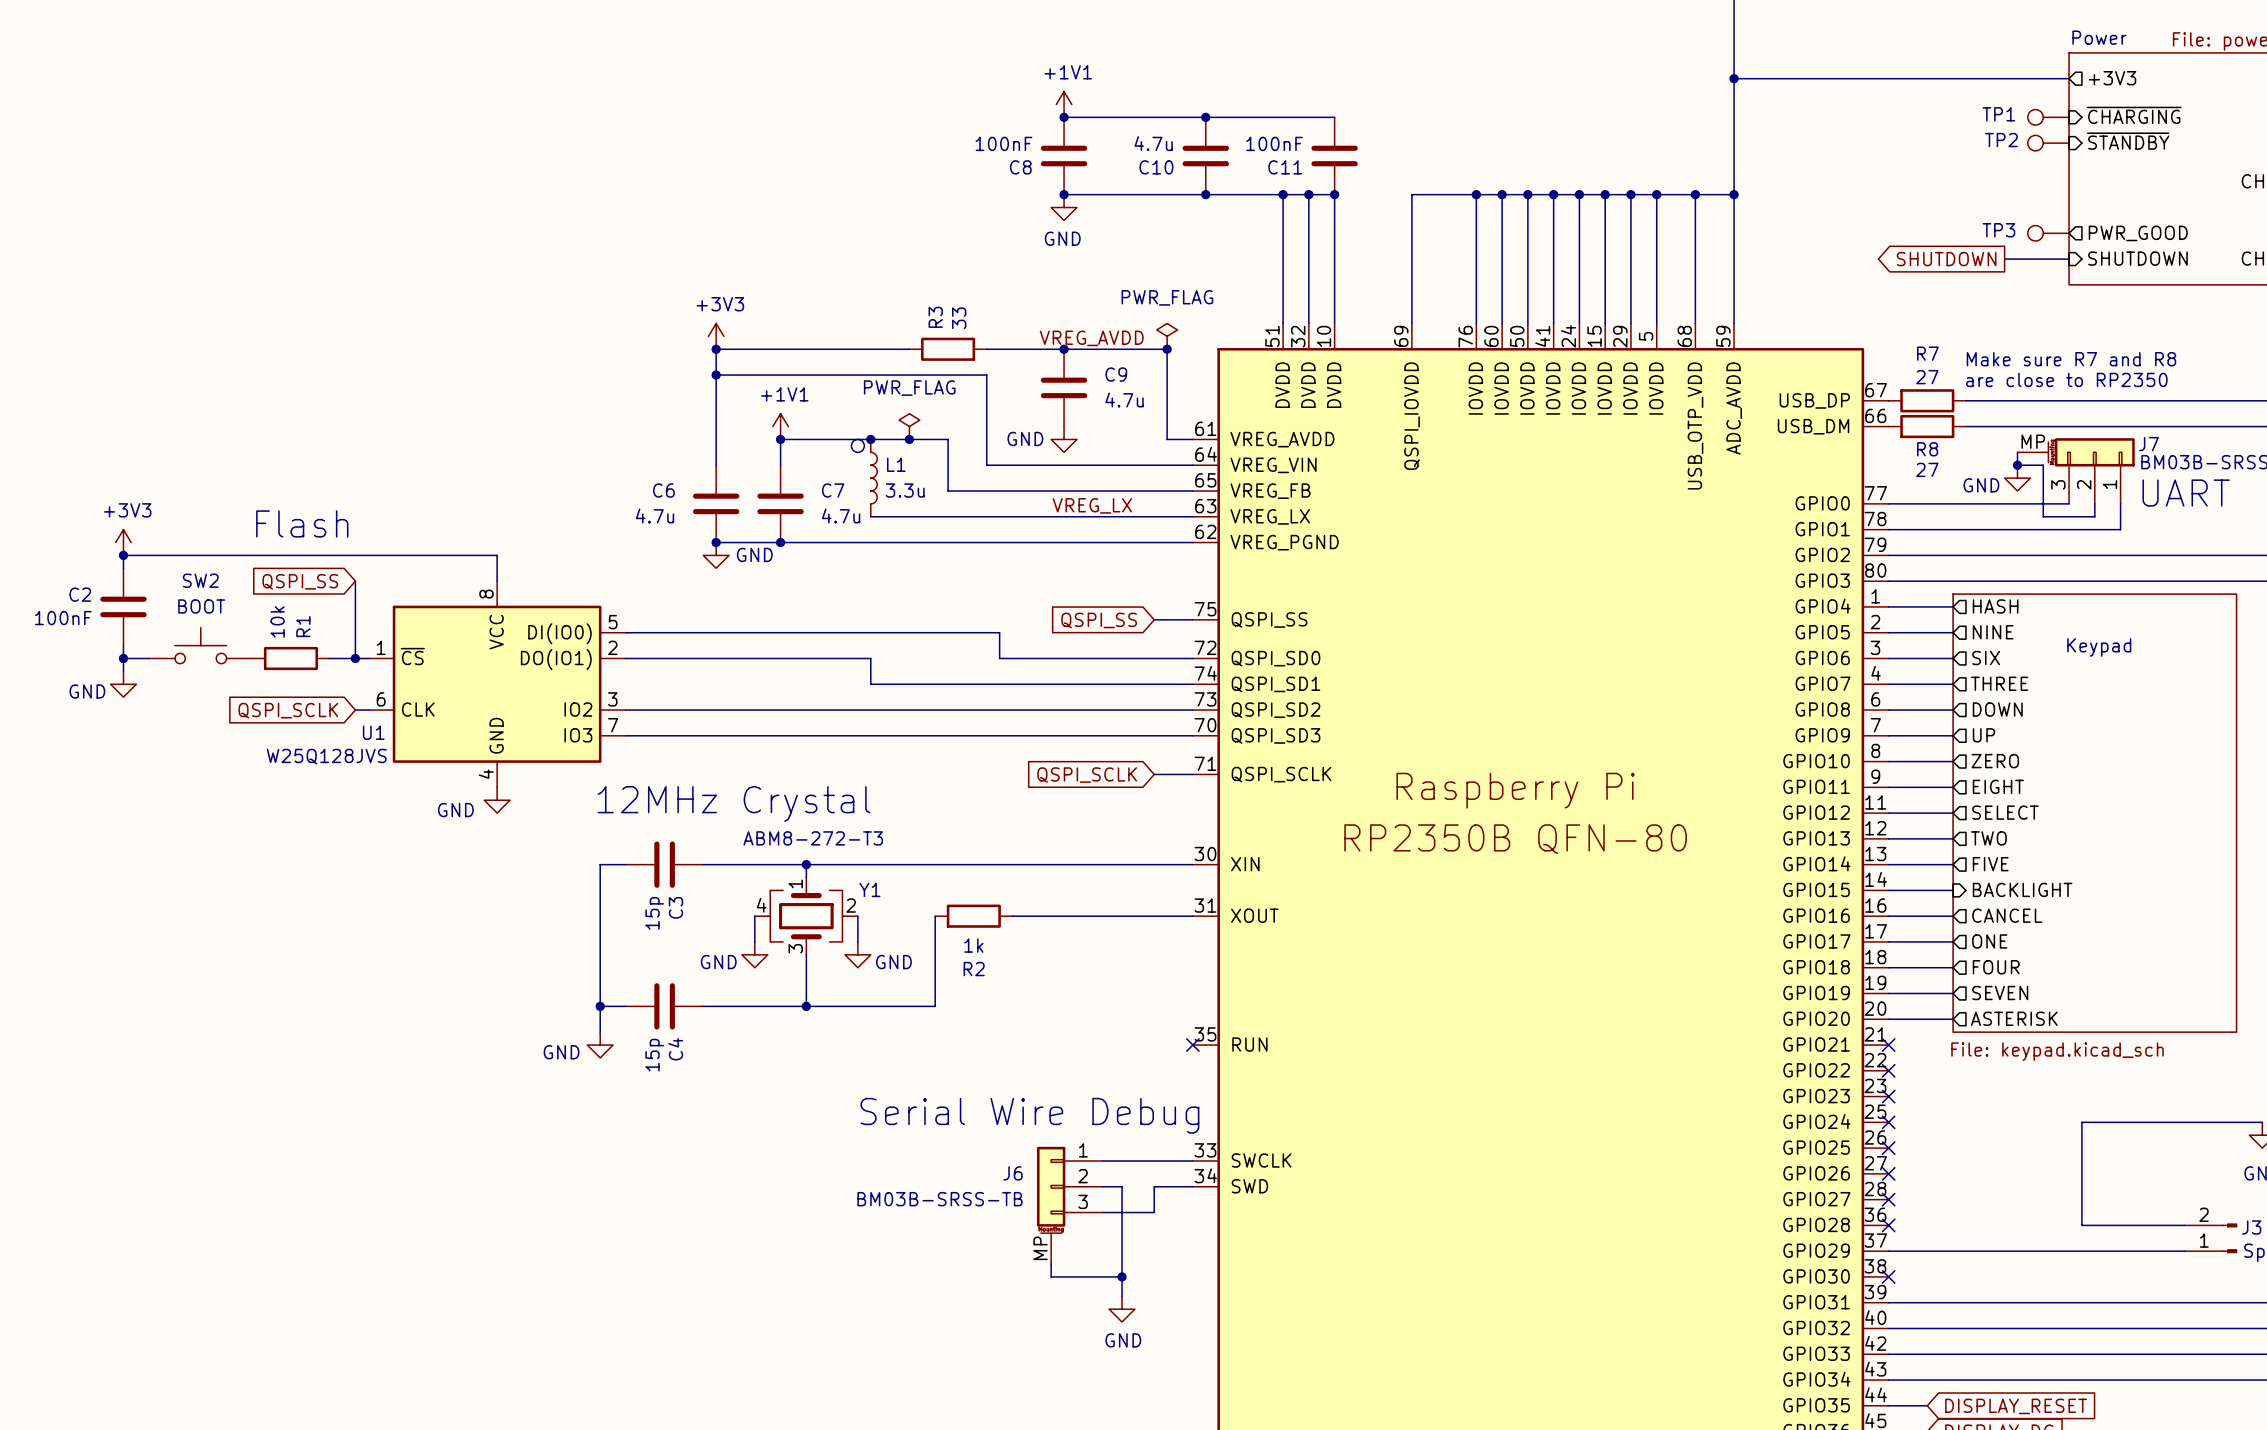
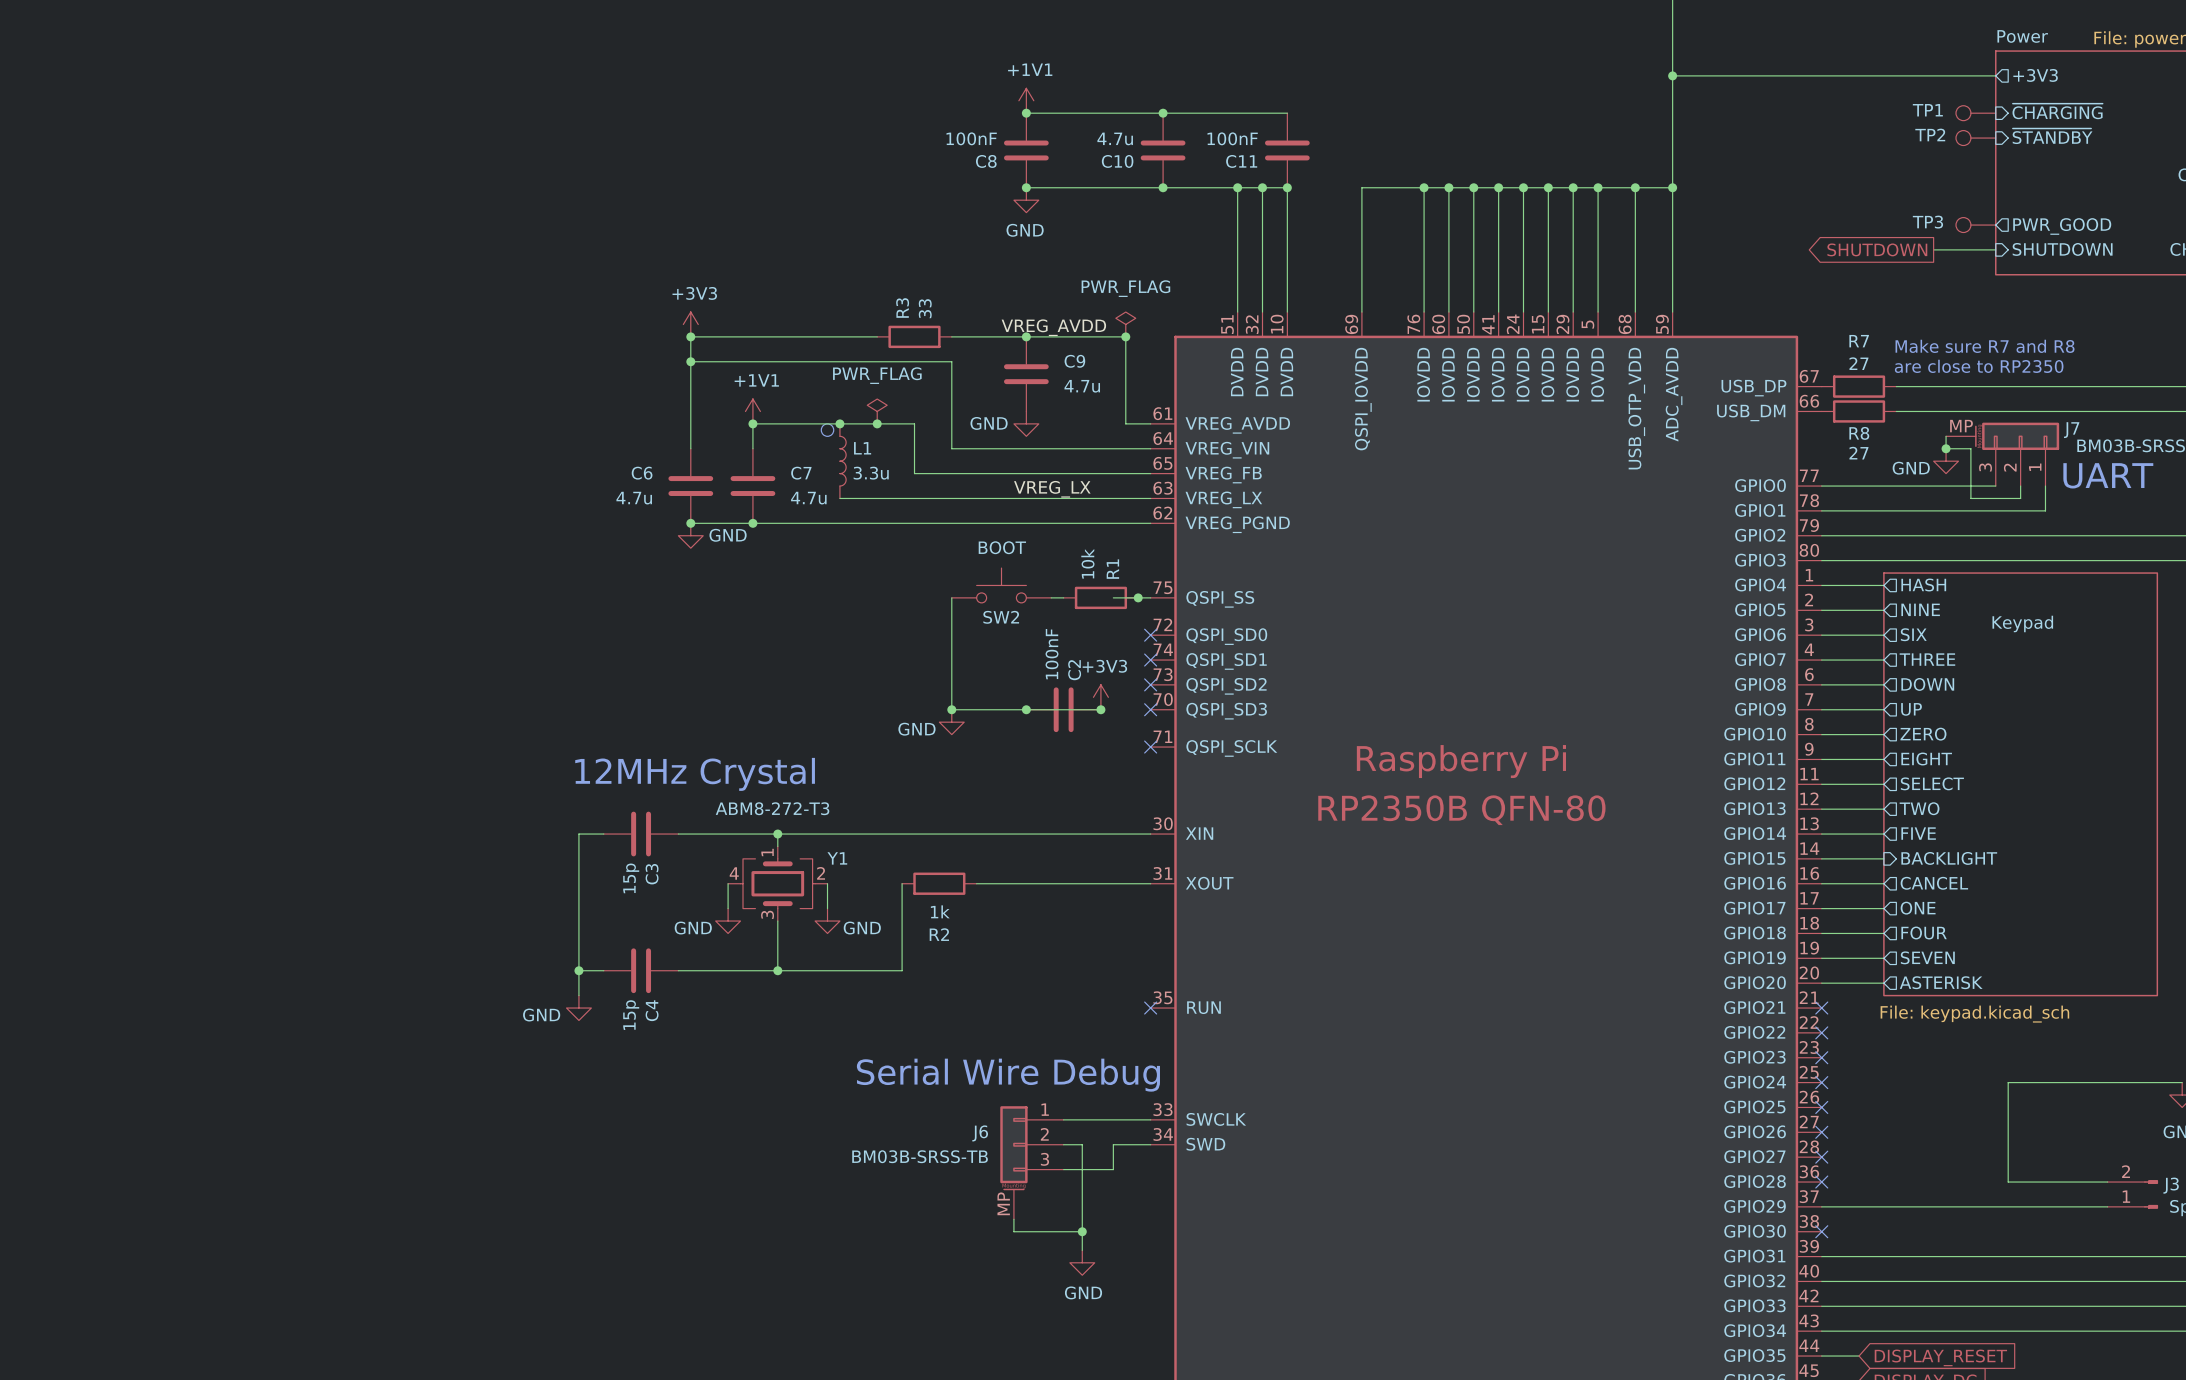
text: Flash (302, 523) -> none
power symbol: +3V3 (123, 542) -> none
junction: (123, 555) -> none
wire: (123, 568) (123, 555) (497, 555) (497, 581) -> none
SW2 name position: SW2 (200, 580) -> SW2 (1001, 617)
global label: QSPI_SS (300, 581) -> none
wire: (355, 581) (355, 658) -> none
C2 rotation: 0° (123, 606) -> 90° clockwise (1063, 709)
C2 position: (123, 606) -> (1063, 709)
wire: none -> (1051, 597) (1063, 597)
junction: none -> (1138, 597)
global label: QSPI_SS (1099, 620) -> none
wire: (625, 632) (999, 632) (999, 658) (1192, 658) -> none
wire: (123, 645) (123, 671) -> none
SW2 position: (200, 645) -> (1001, 585)
wire: (123, 658) (149, 658) -> none
junction: (123, 658) -> none
R1 position: (290, 658) -> (1100, 597)
wire: (329, 658) (368, 658) -> none
junction: (355, 658) -> none
wire: (625, 658) (870, 658) (870, 684) (1192, 684) -> none
no-connect mark: none -> (1150, 635)
power symbol: GND (123, 684) -> none
U1: W25Q128JVS (497, 684) -> none
no-connect mark: none -> (1150, 660)
global label: QSPI_SCLK (288, 710) -> none
wire: (355, 710) (368, 710) -> none
wire: (625, 710) (1192, 710) -> none
no-connect mark: none -> (1150, 684)
power symbol: none -> +3V3 (1100, 697)
wire: (625, 735) (986, 735) -> (951, 597) (951, 709)
junction: none -> (951, 709)
junction: none -> (1026, 709)
wire: (1141, 735) (1192, 735) -> none
junction: none -> (1100, 709)
no-connect mark: none -> (1150, 709)
power symbol: none -> GND (951, 722)
wire: (1154, 774) (1192, 774) -> none
no-connect mark: none -> (1150, 747)
global label: QSPI_SCLK (1087, 775) -> none
power symbol: GND (497, 800) -> none

